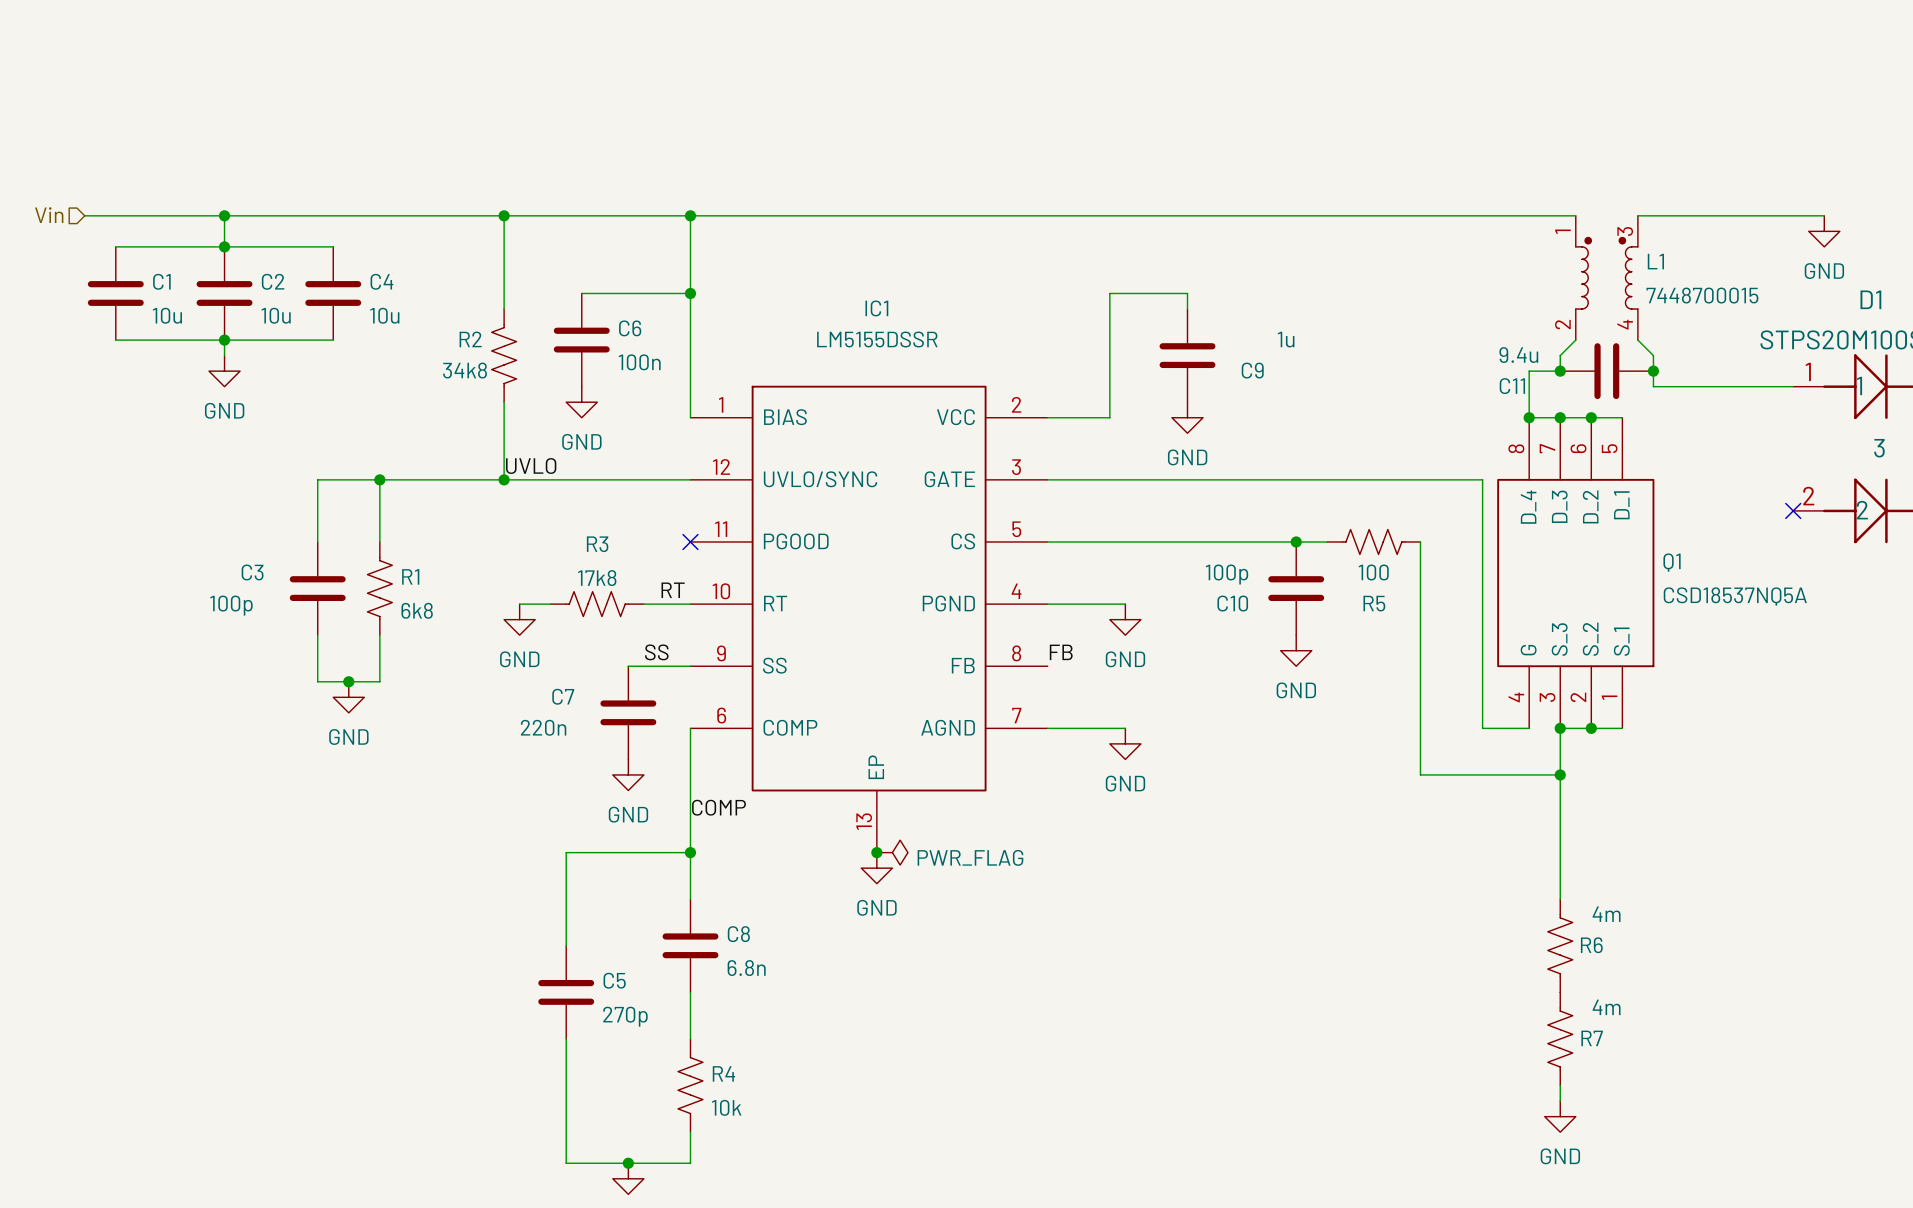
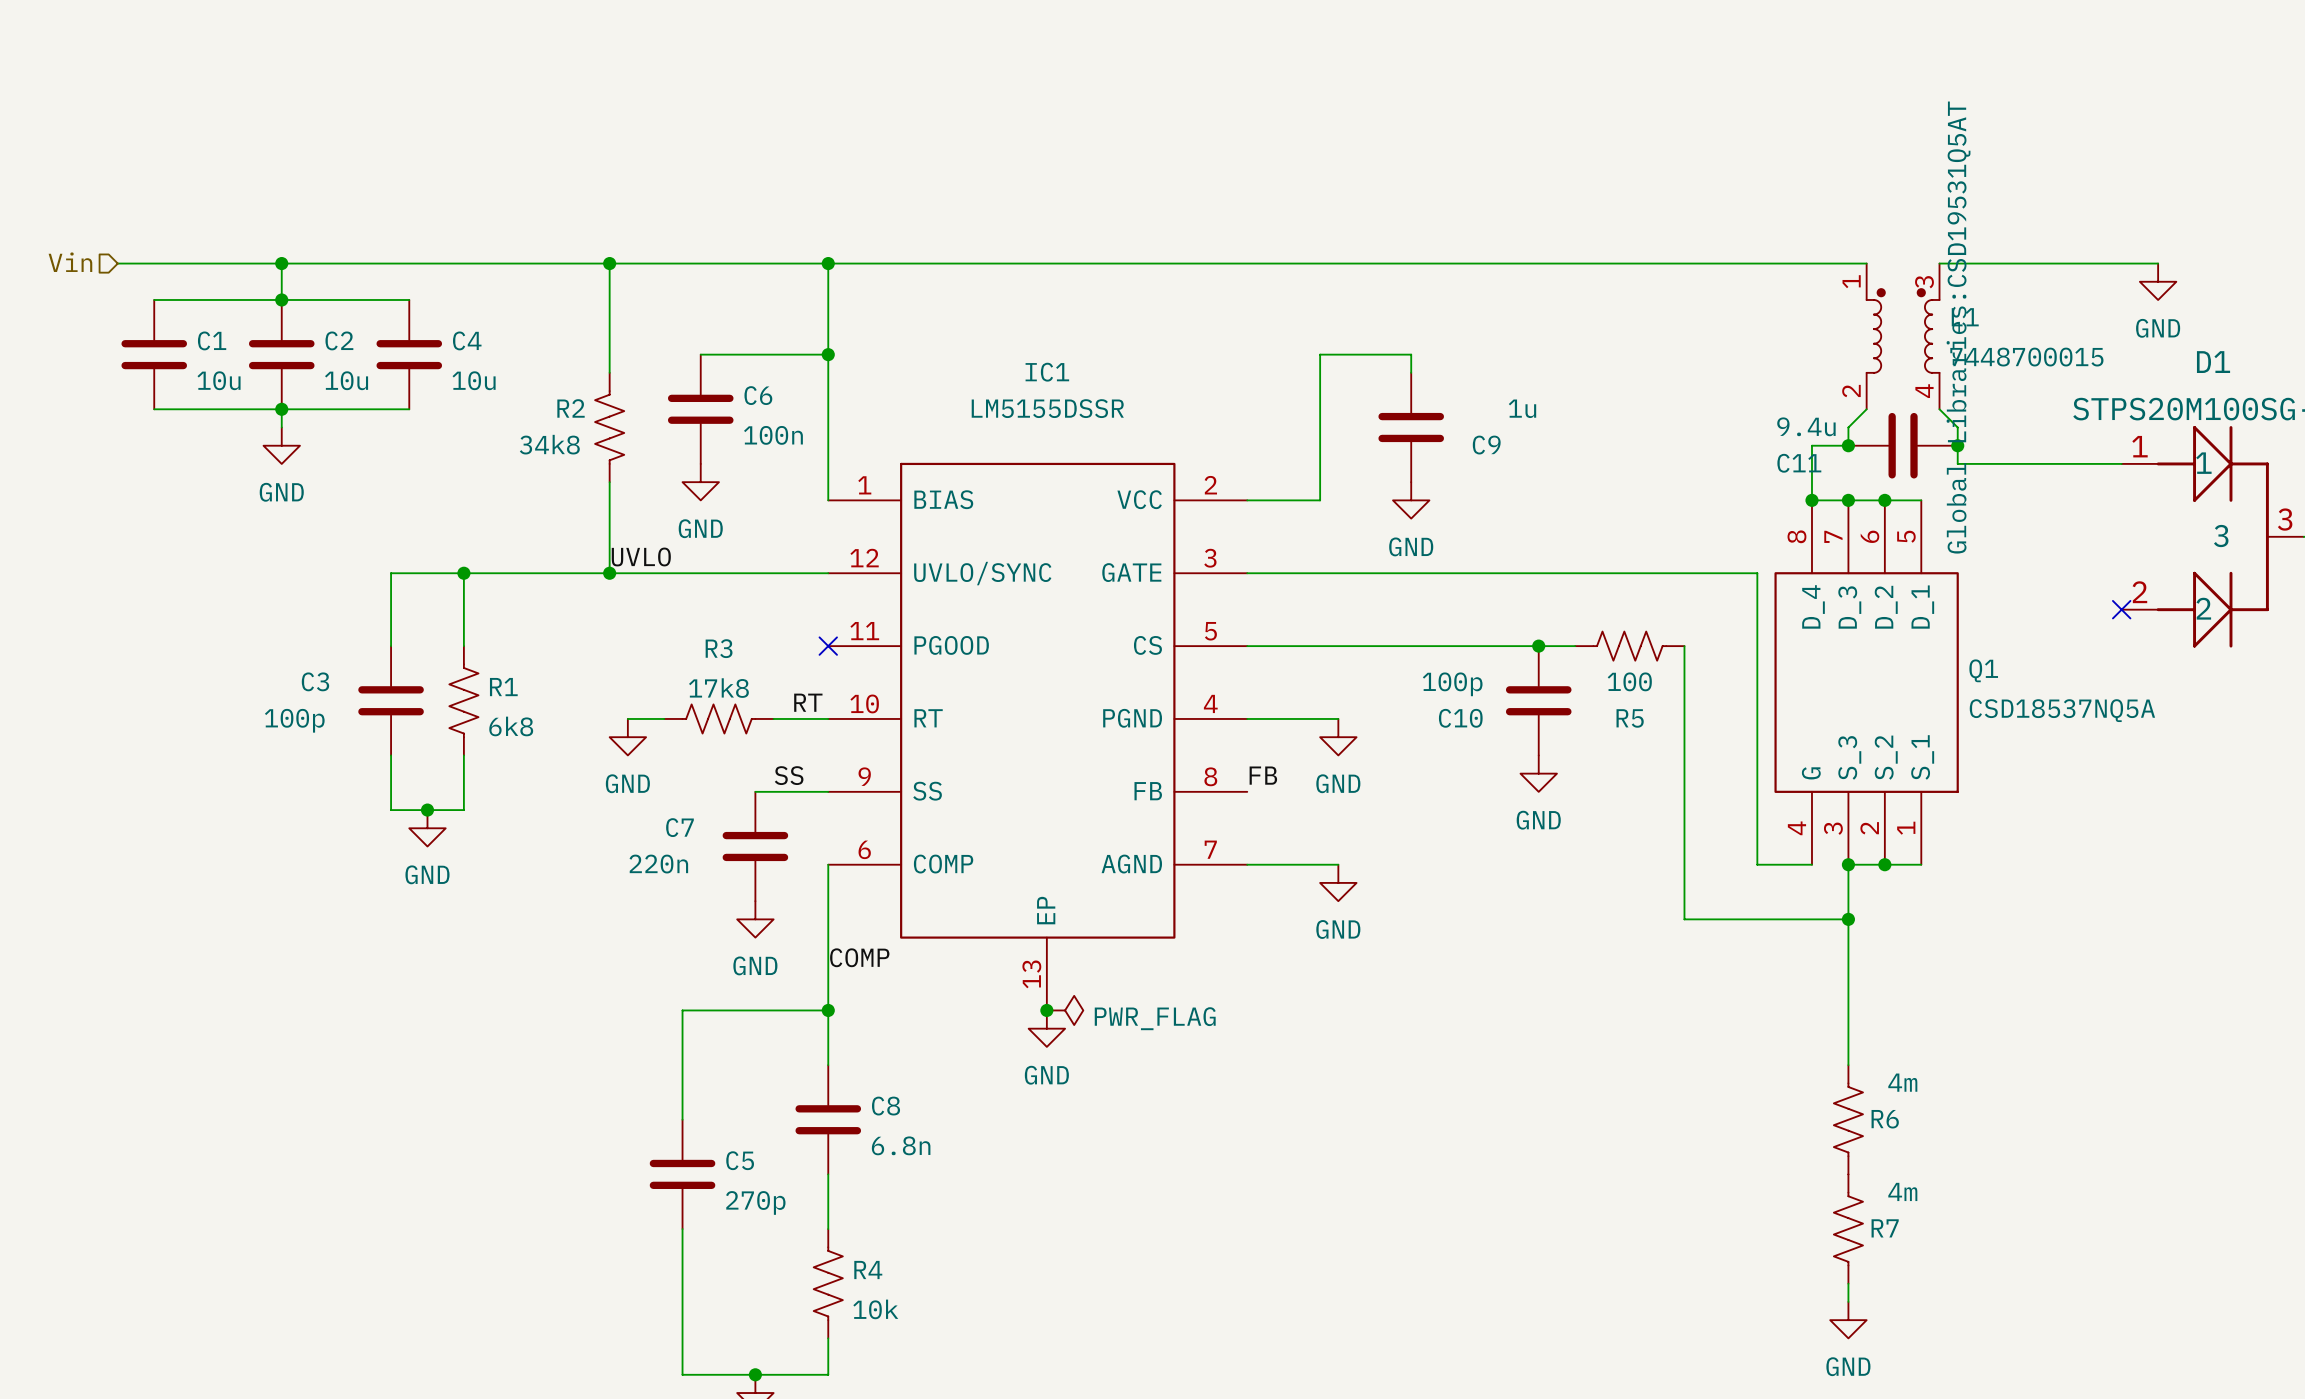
Q1 text: none -> Global Libraries:CSD19531Q5AT (1958, 327)
R2 value position: 34k8 (465, 370) -> 34k8 (549, 444)

